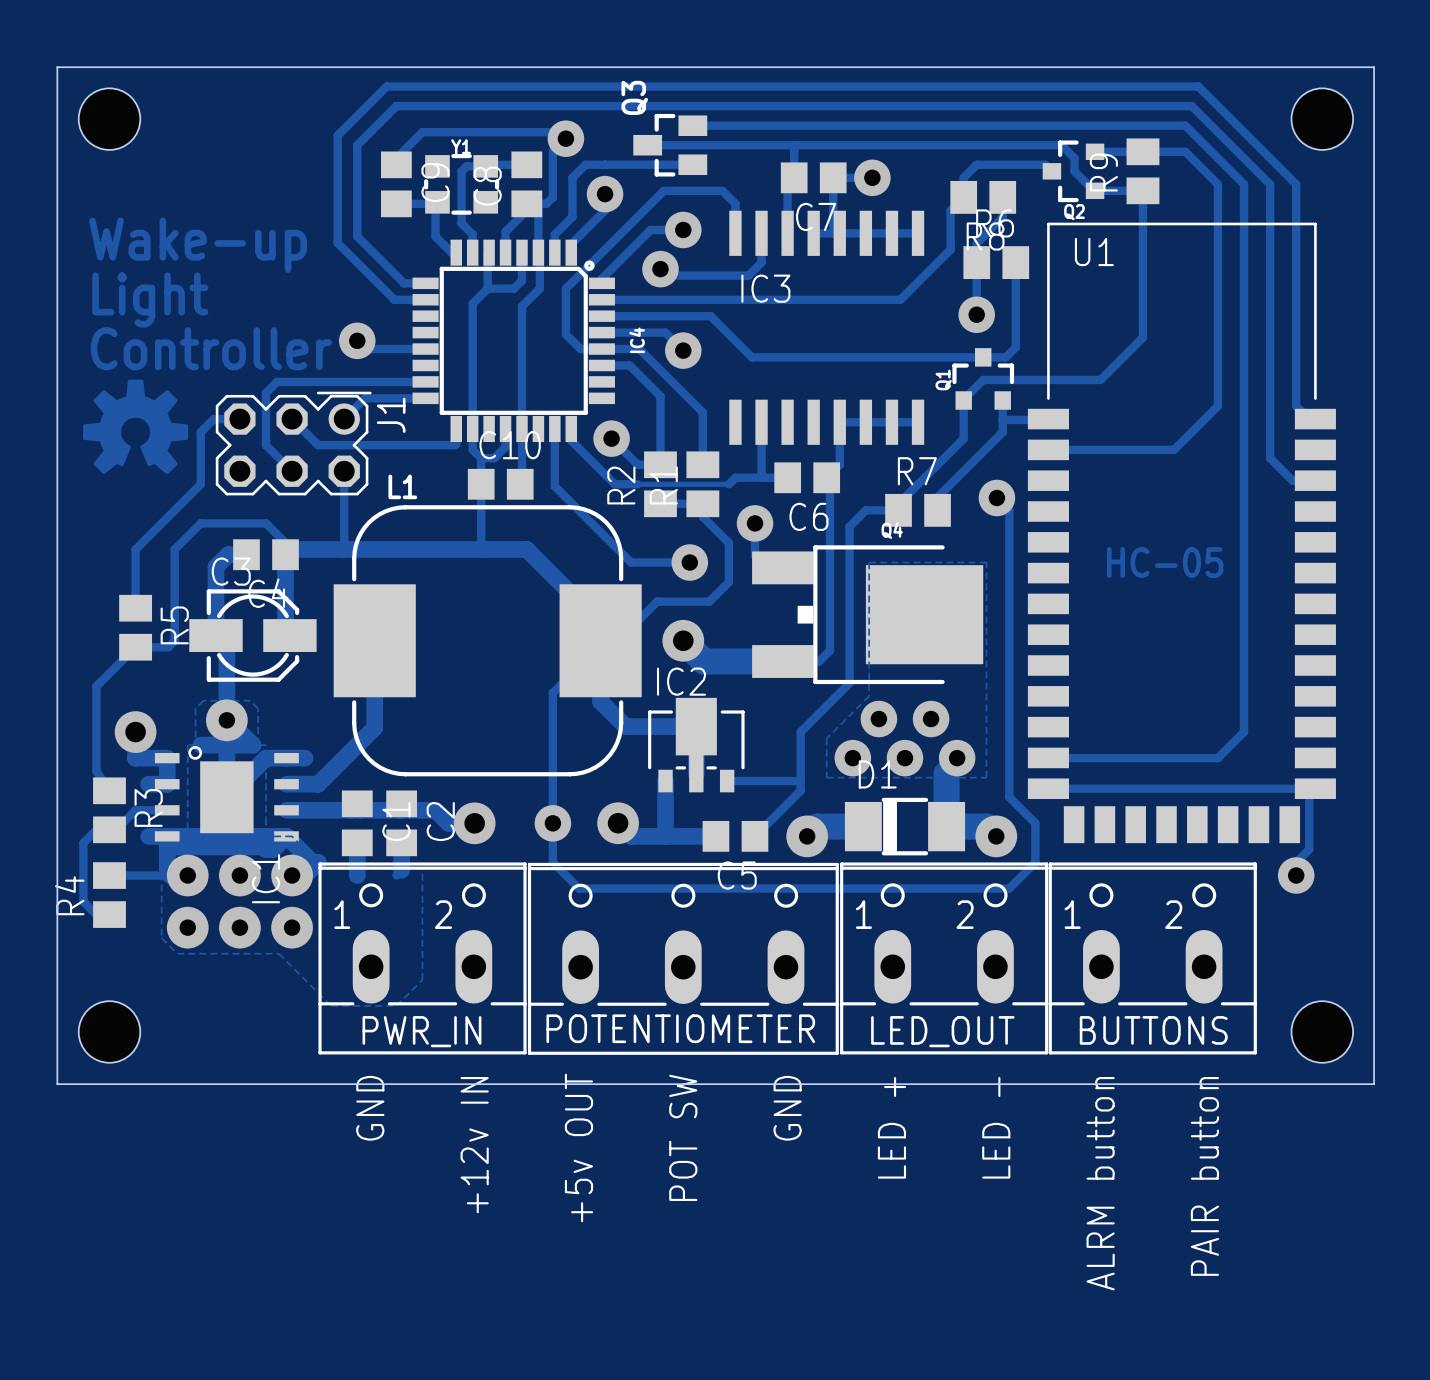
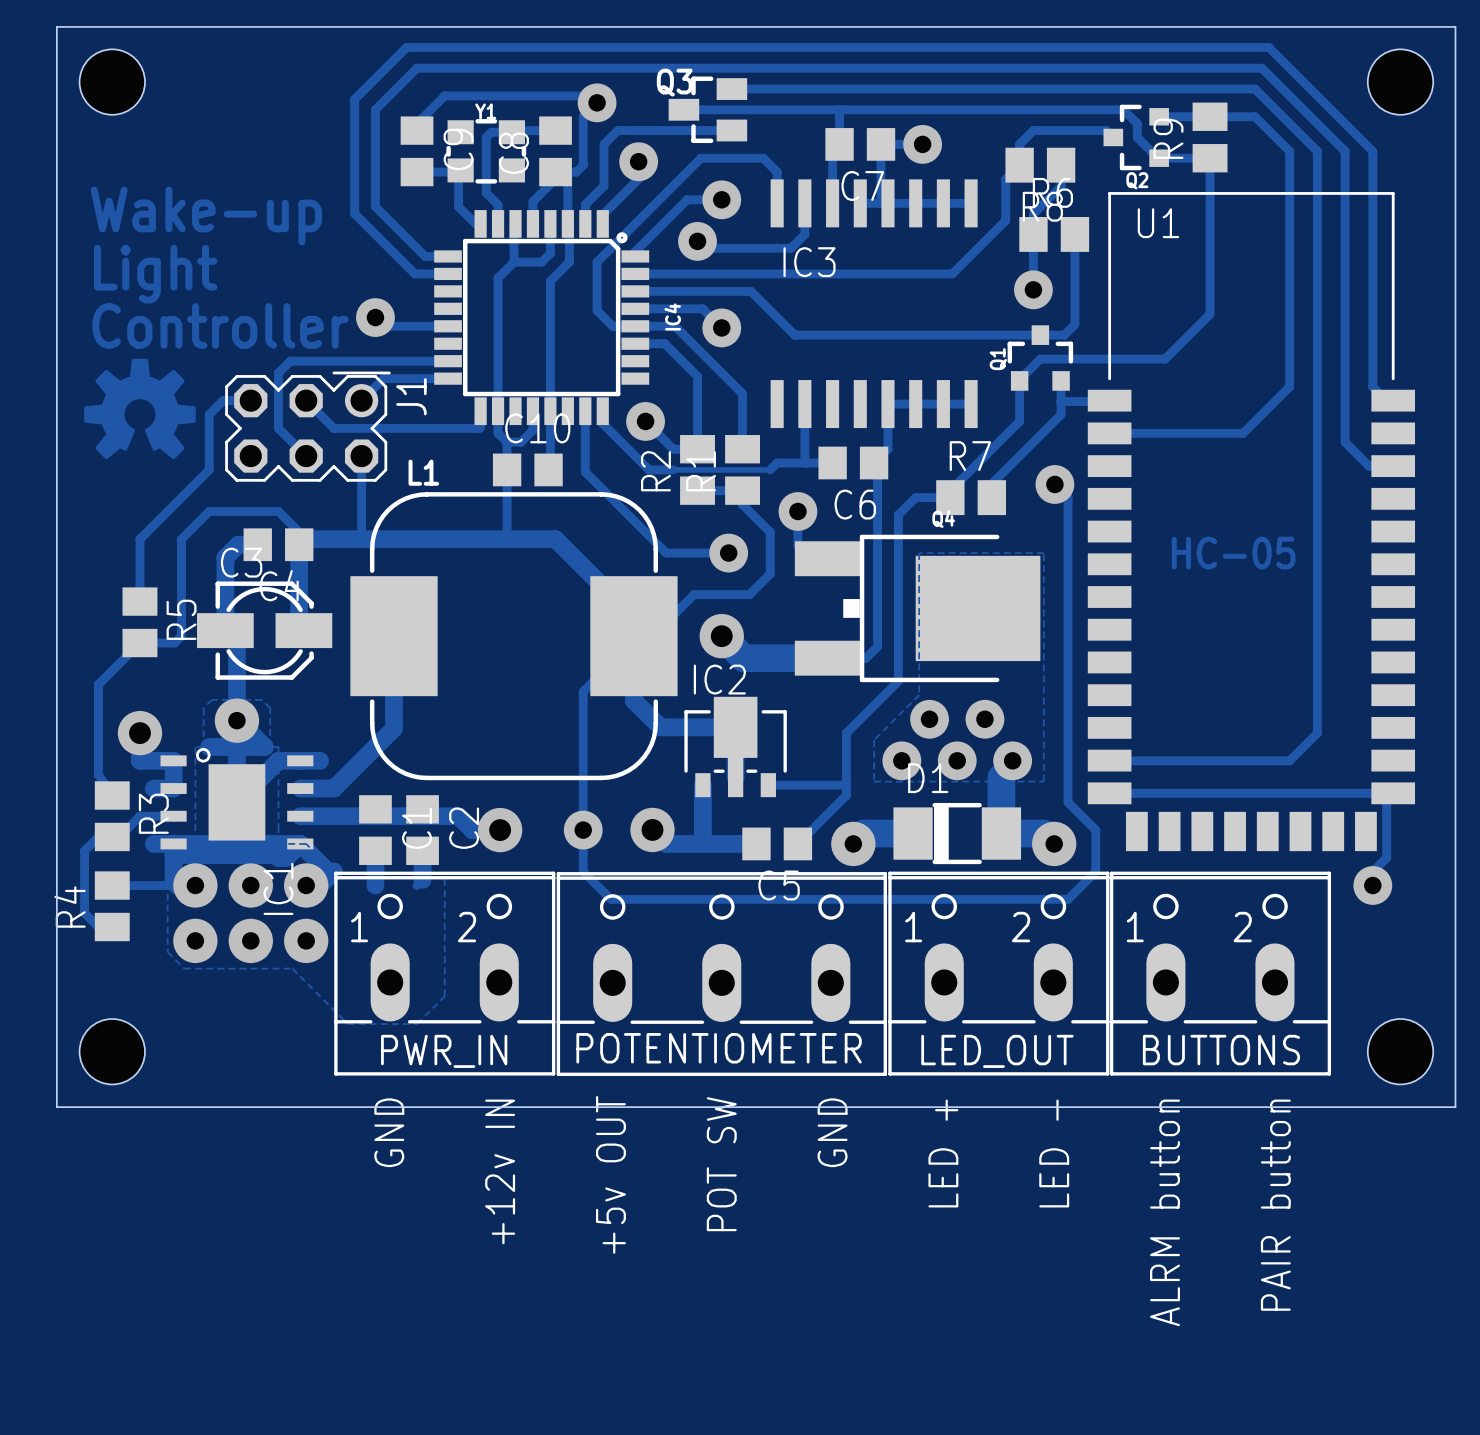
Q3 name rotation: 0° (634, 97) -> 90° clockwise (674, 82)

